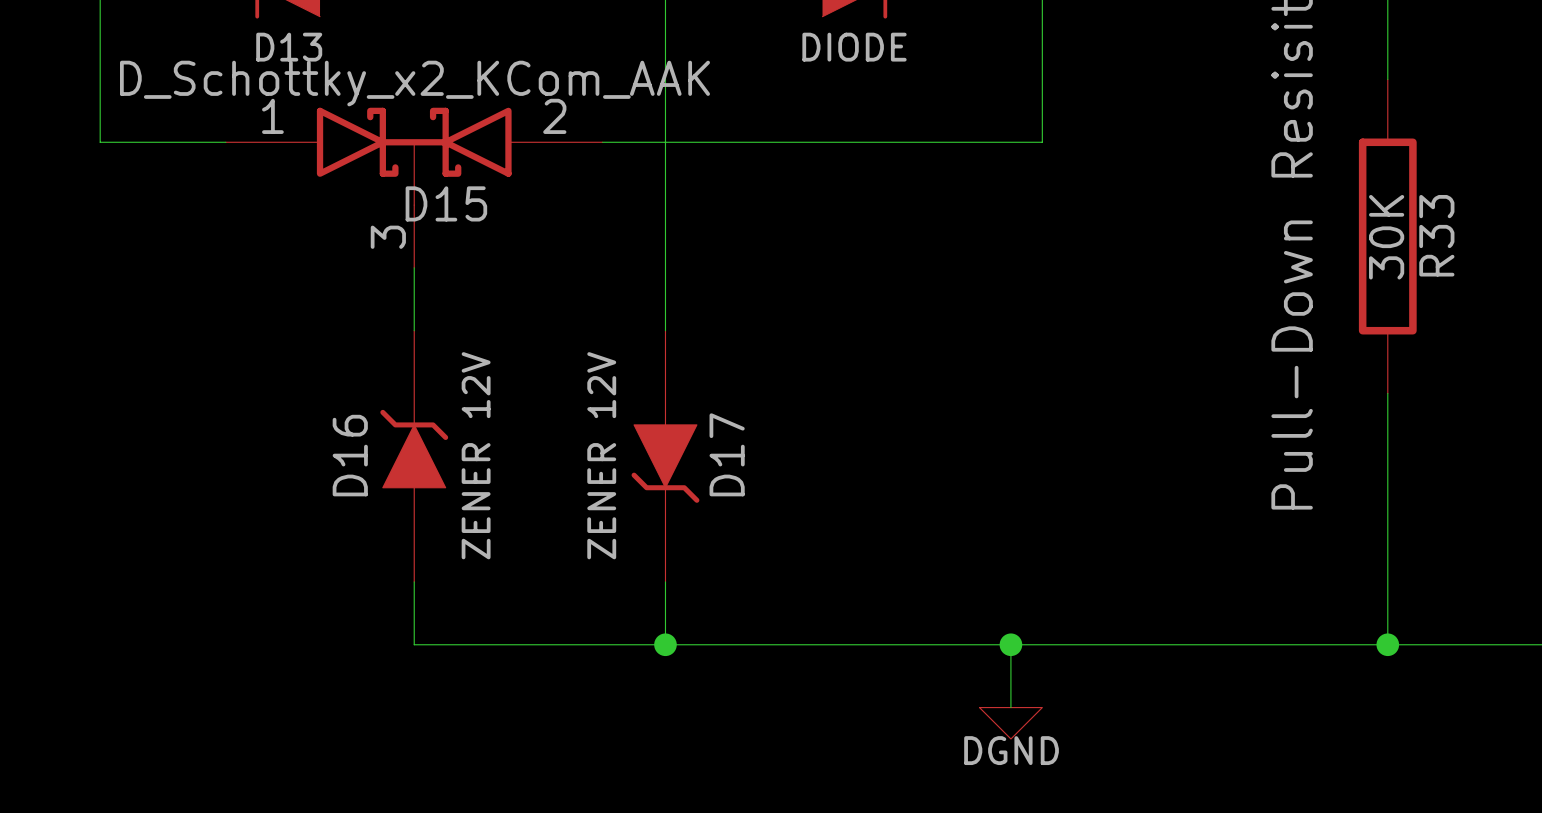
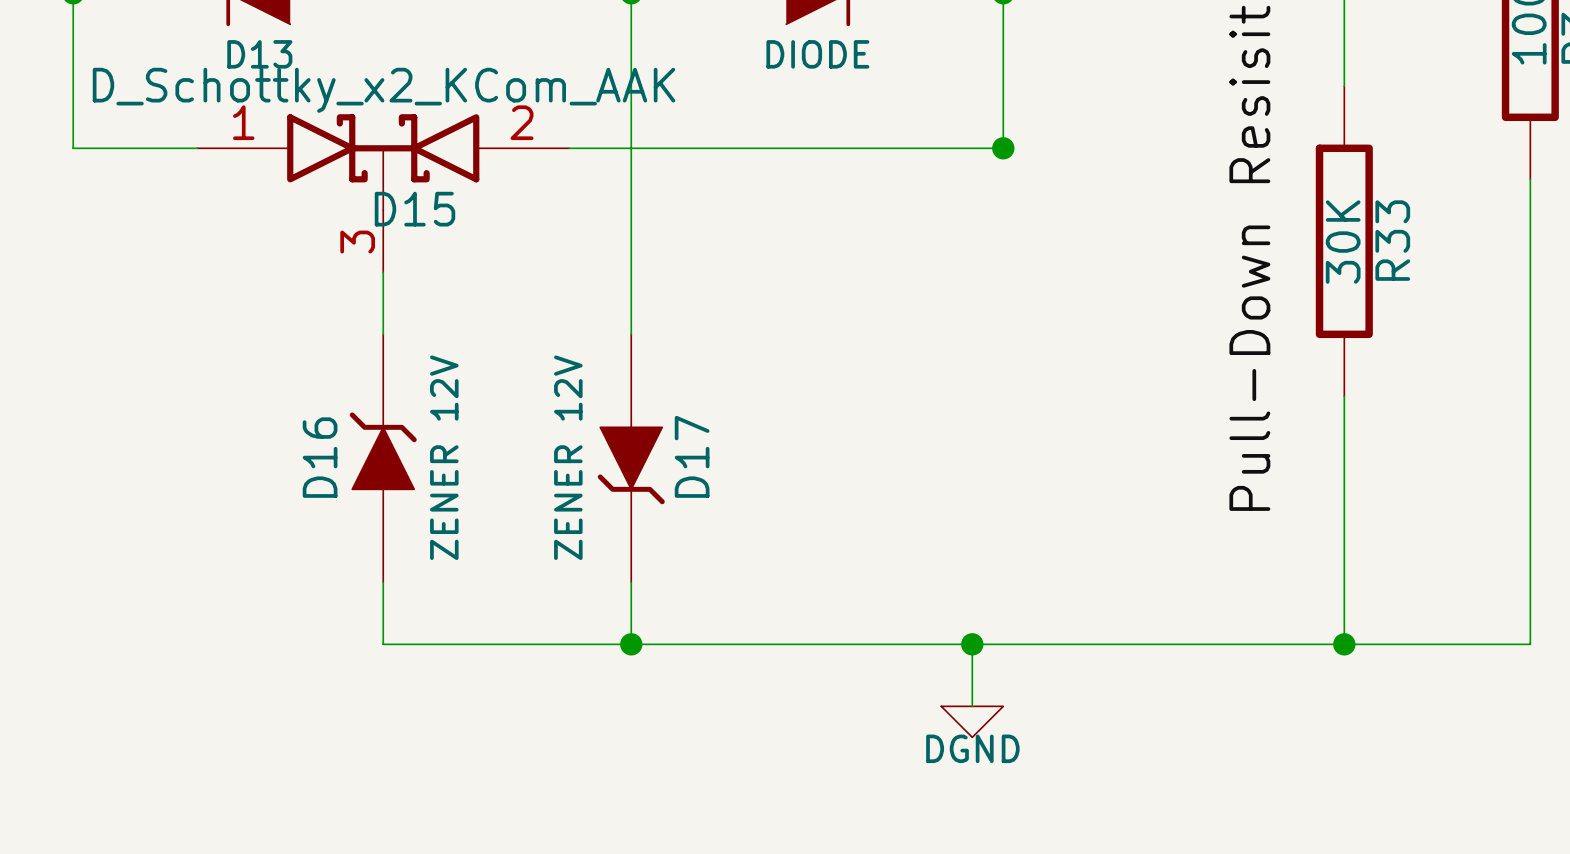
junction: none -> (1003, 148)

